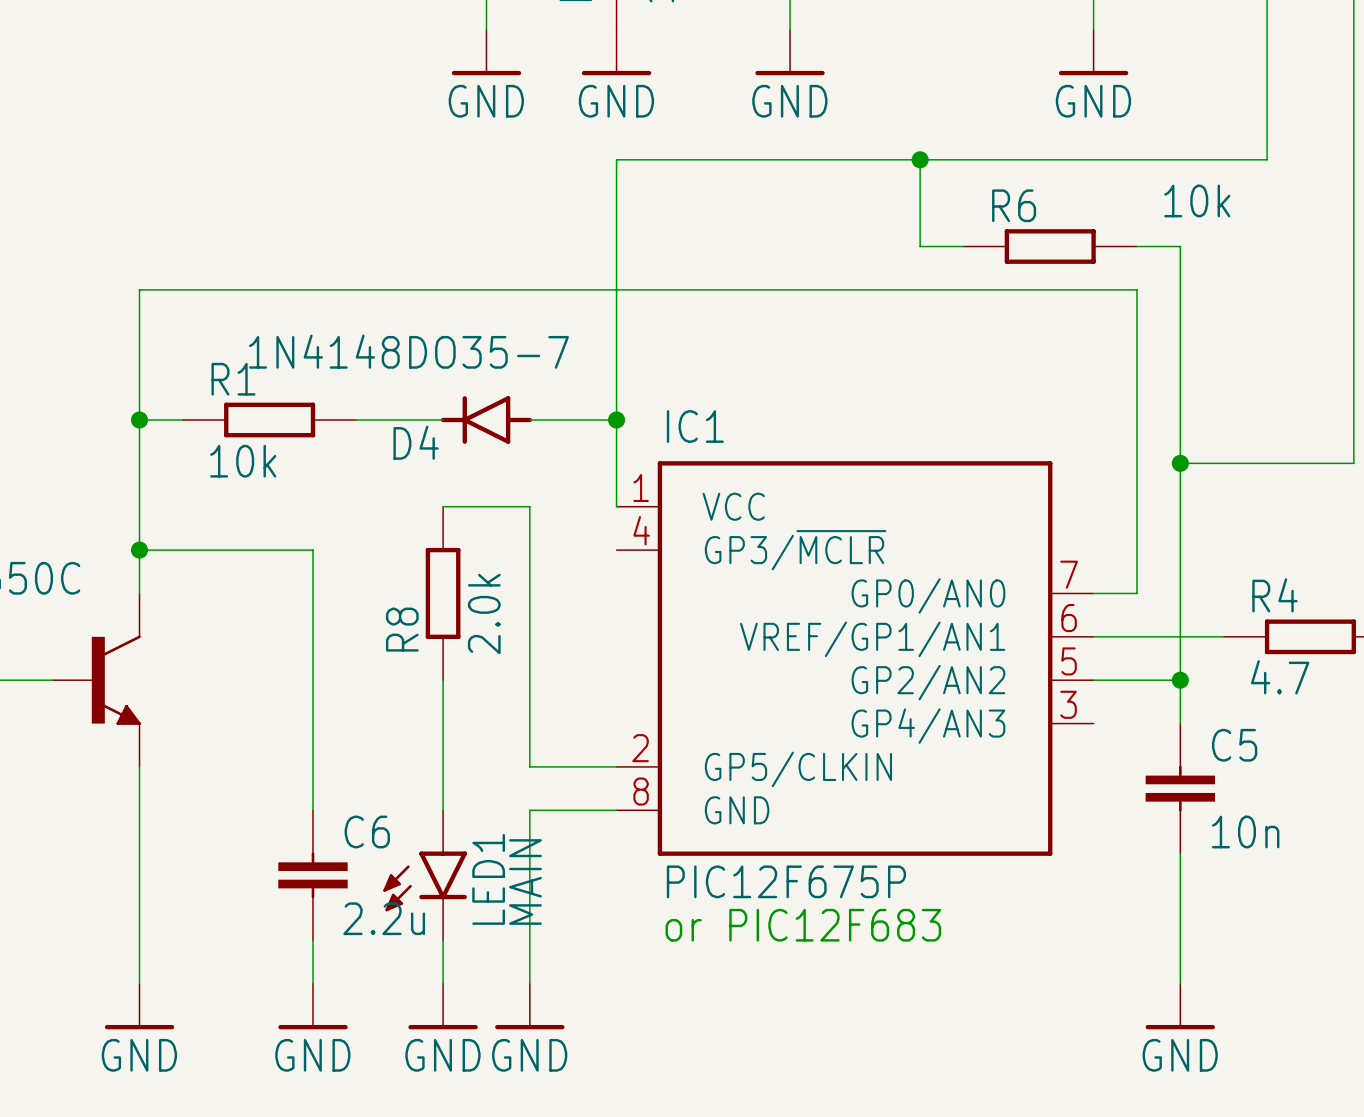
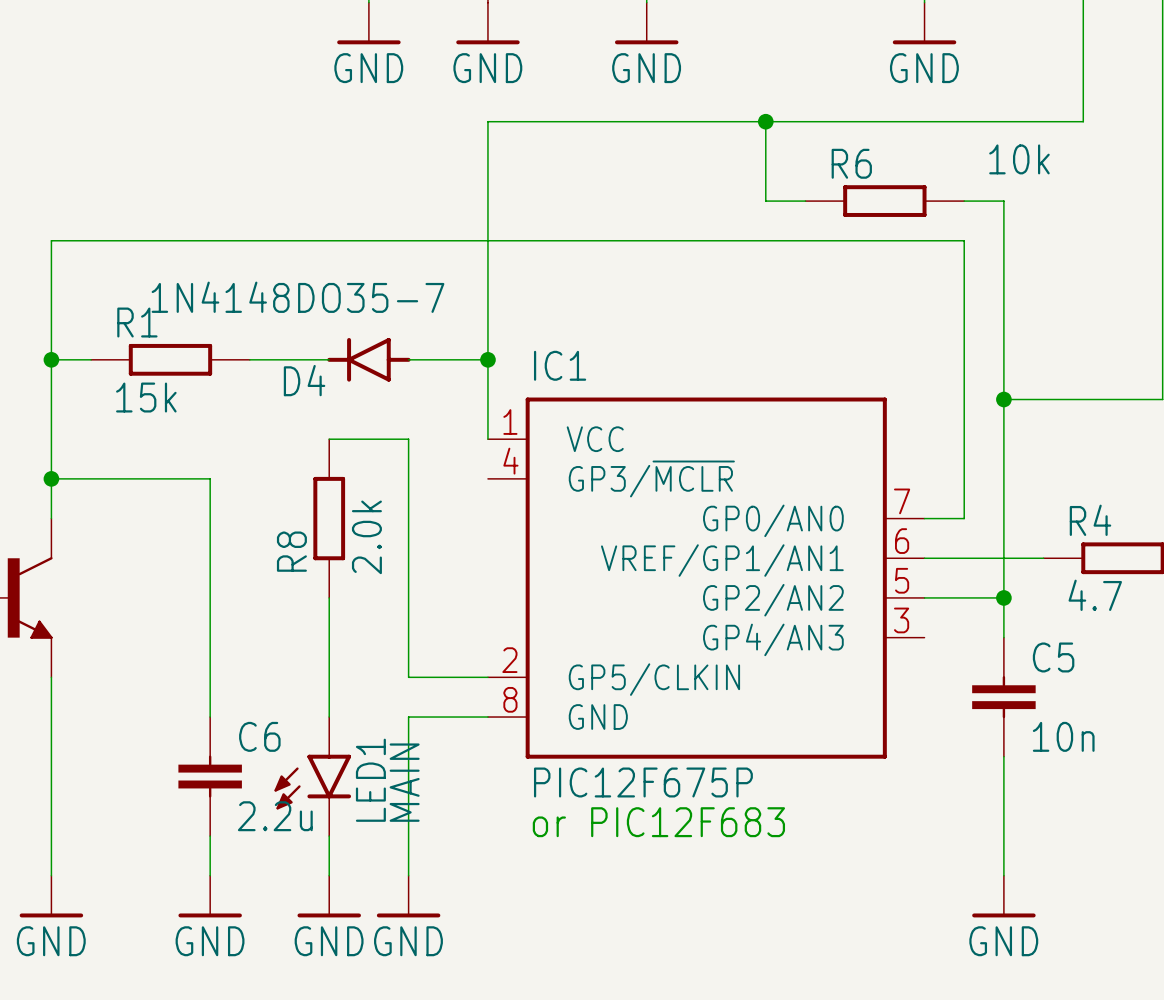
R1 value: 10k (243, 461) -> 15k (146, 397)

